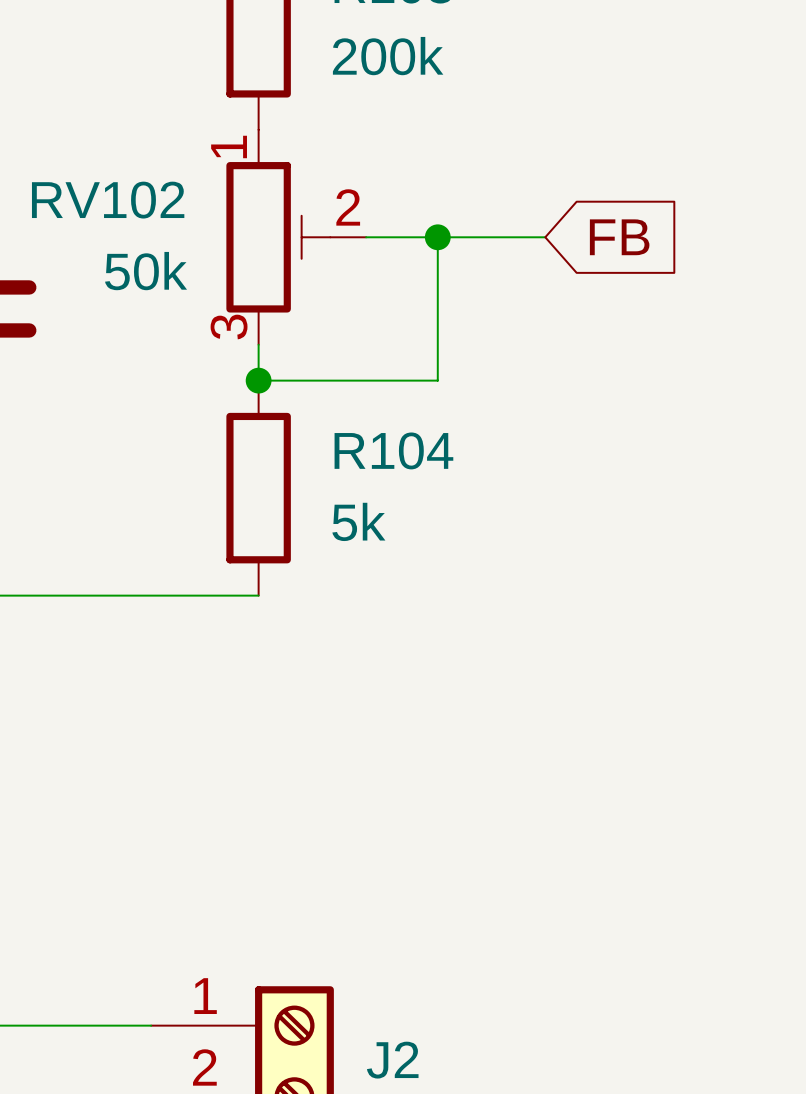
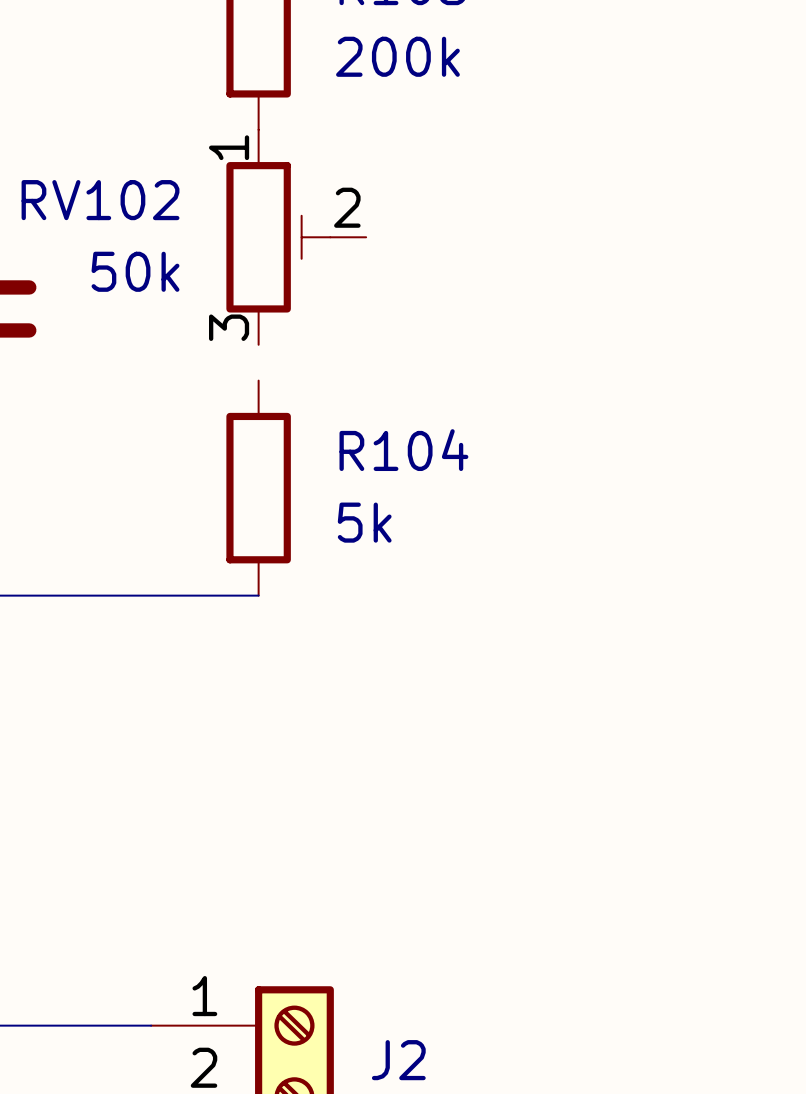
wire: (366, 237) (545, 237) -> none
wire: (437, 237) (437, 380) (258, 380) (258, 344) -> none
junction: (437, 237) -> none
global label: FB (619, 237) -> none
junction: (258, 380) -> none

